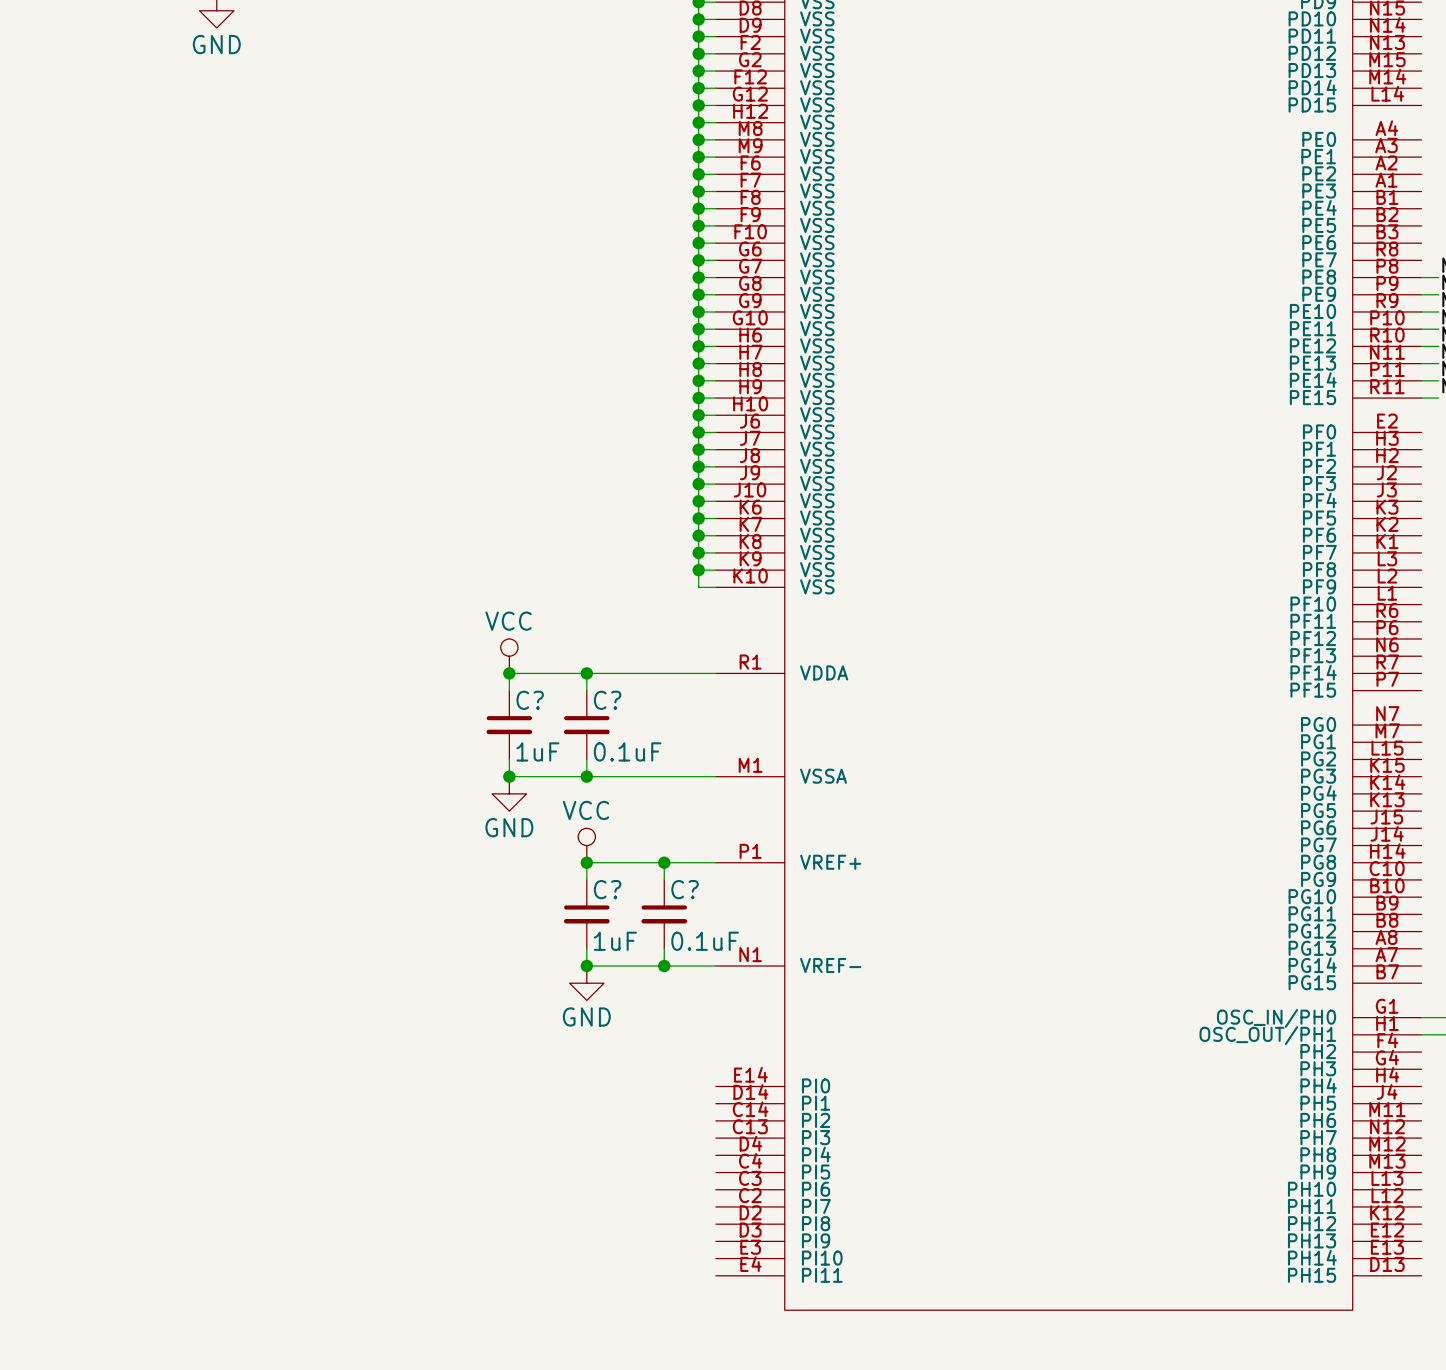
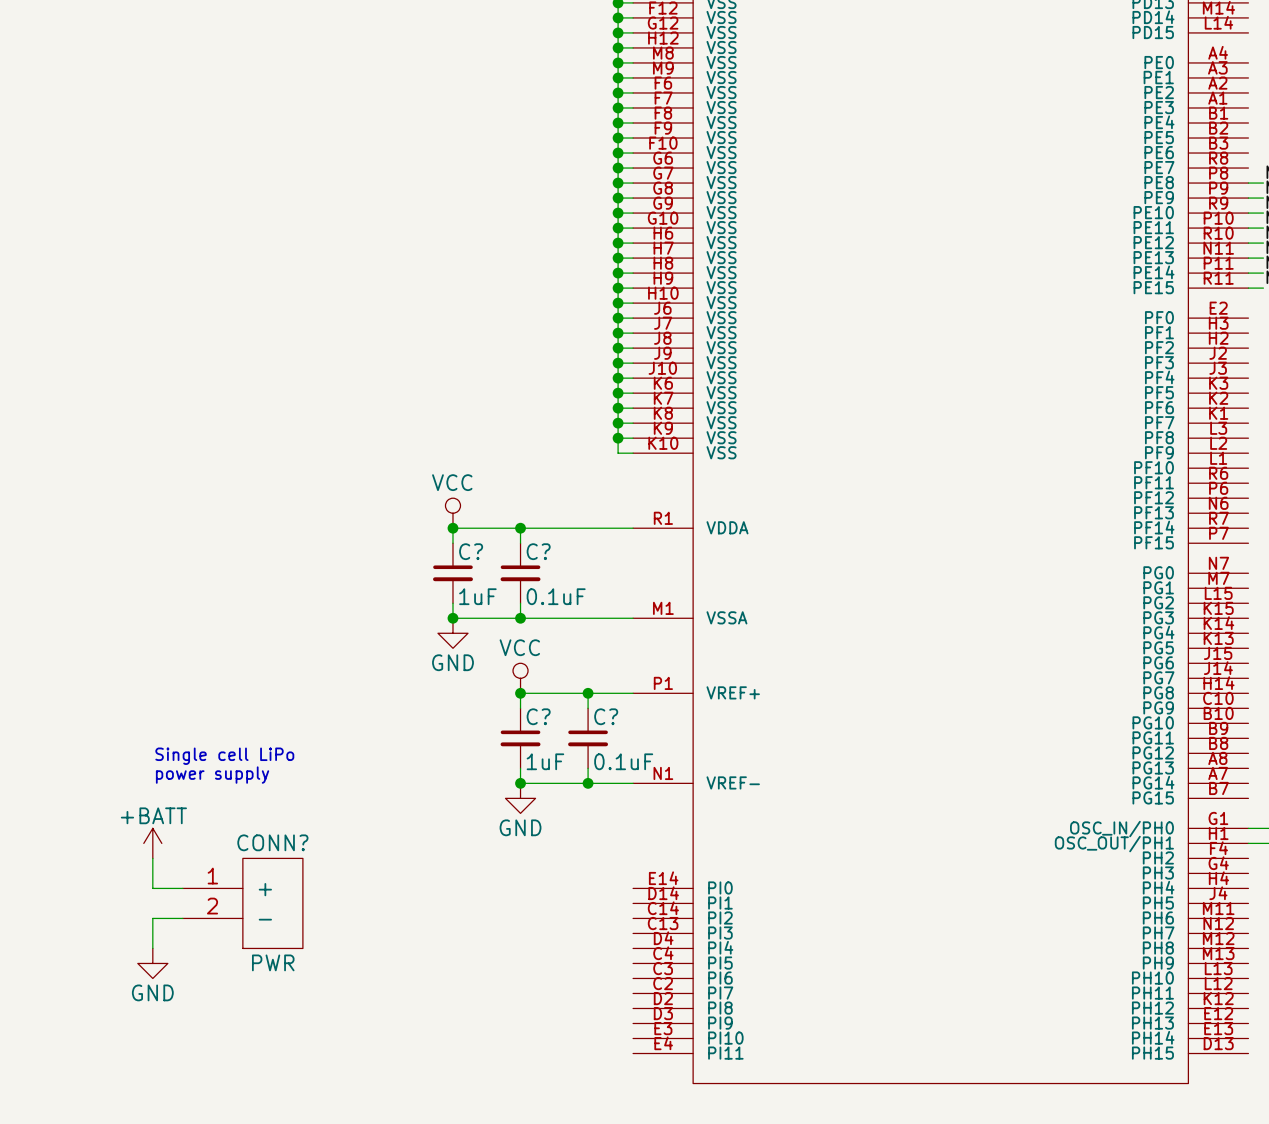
text: none -> Single cell LiPo (224, 756)
text: none -> power supply (212, 775)
power symbol: none -> +BATT (152, 843)
wire: none -> (152, 858) (152, 888) (182, 888)
CONN?: none -> PWR (242, 903)
wire: none -> (182, 918) (152, 918) (152, 948)
power symbol: none -> GND (152, 963)

